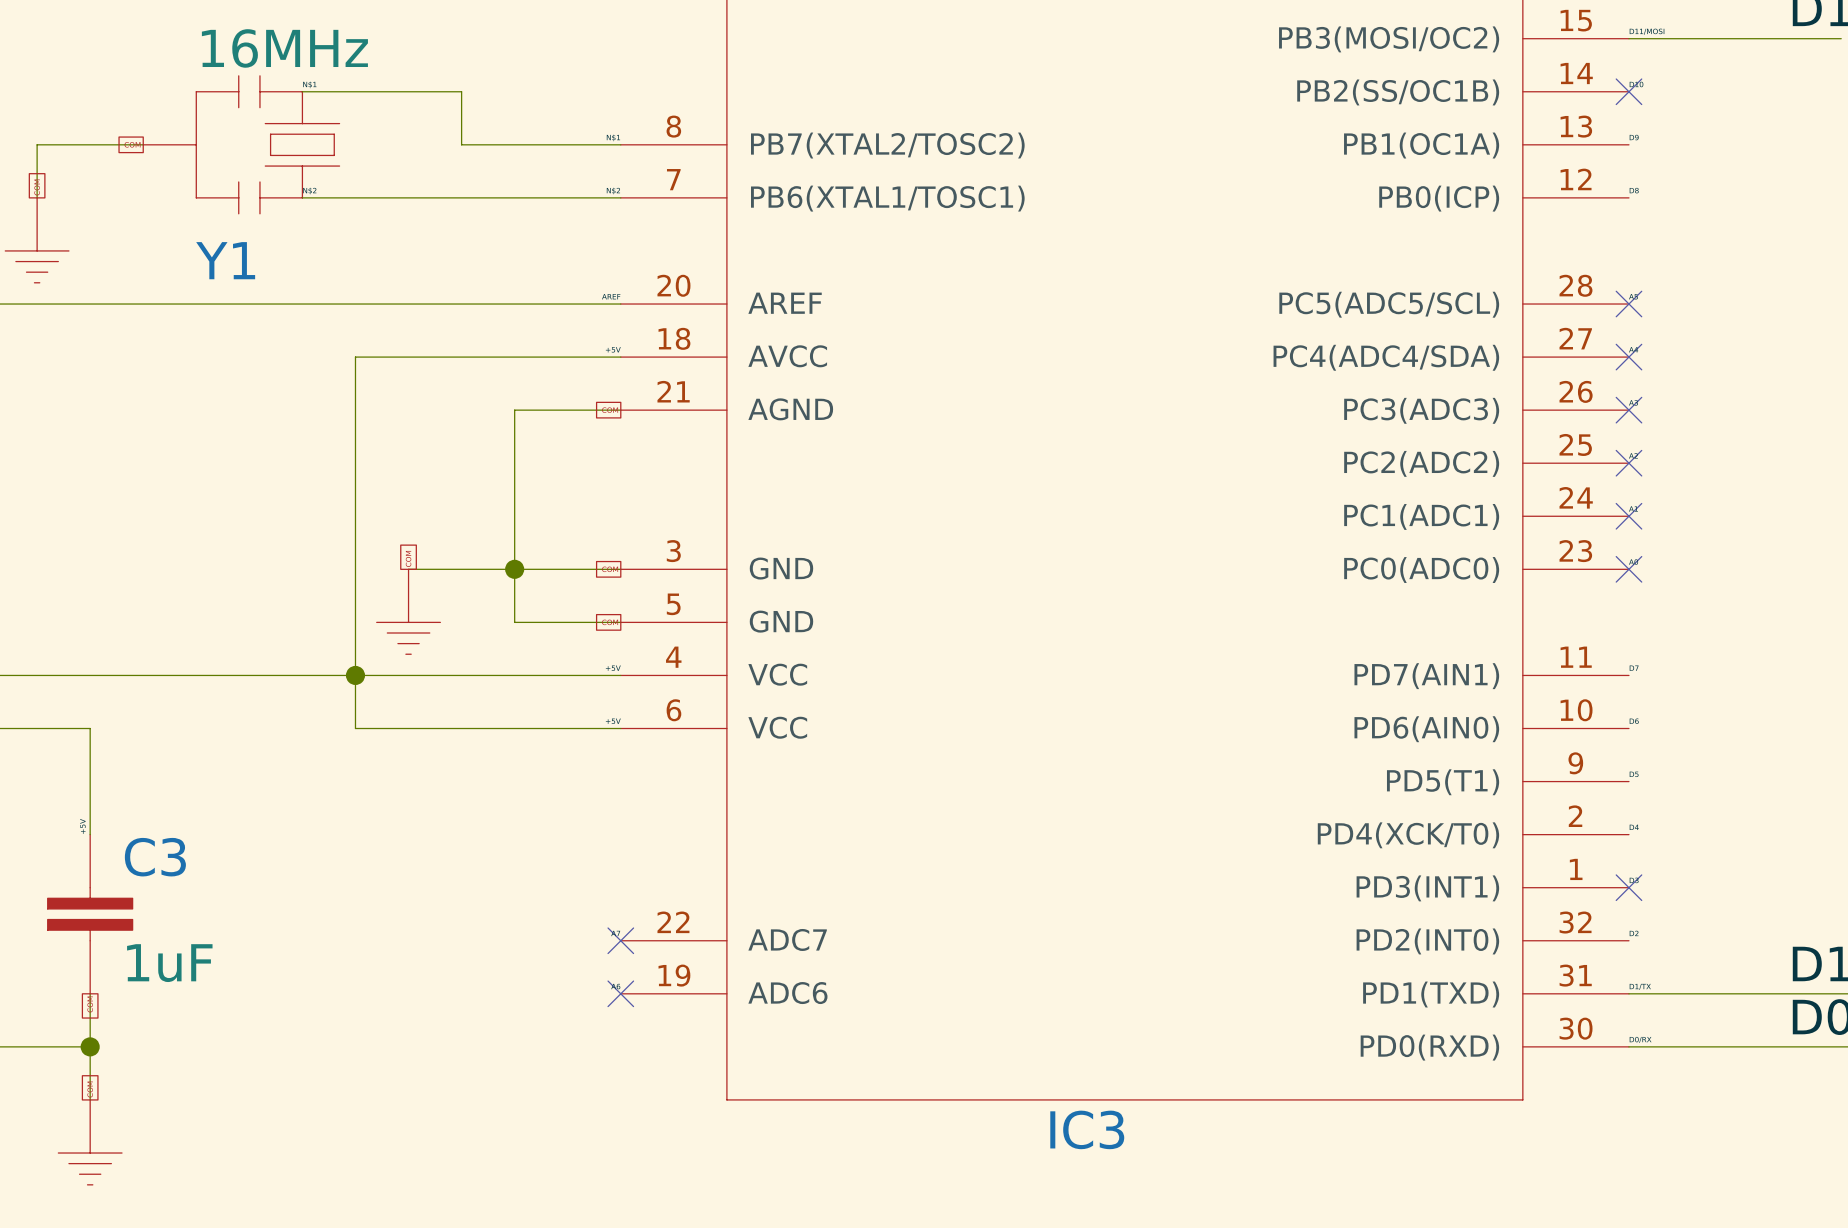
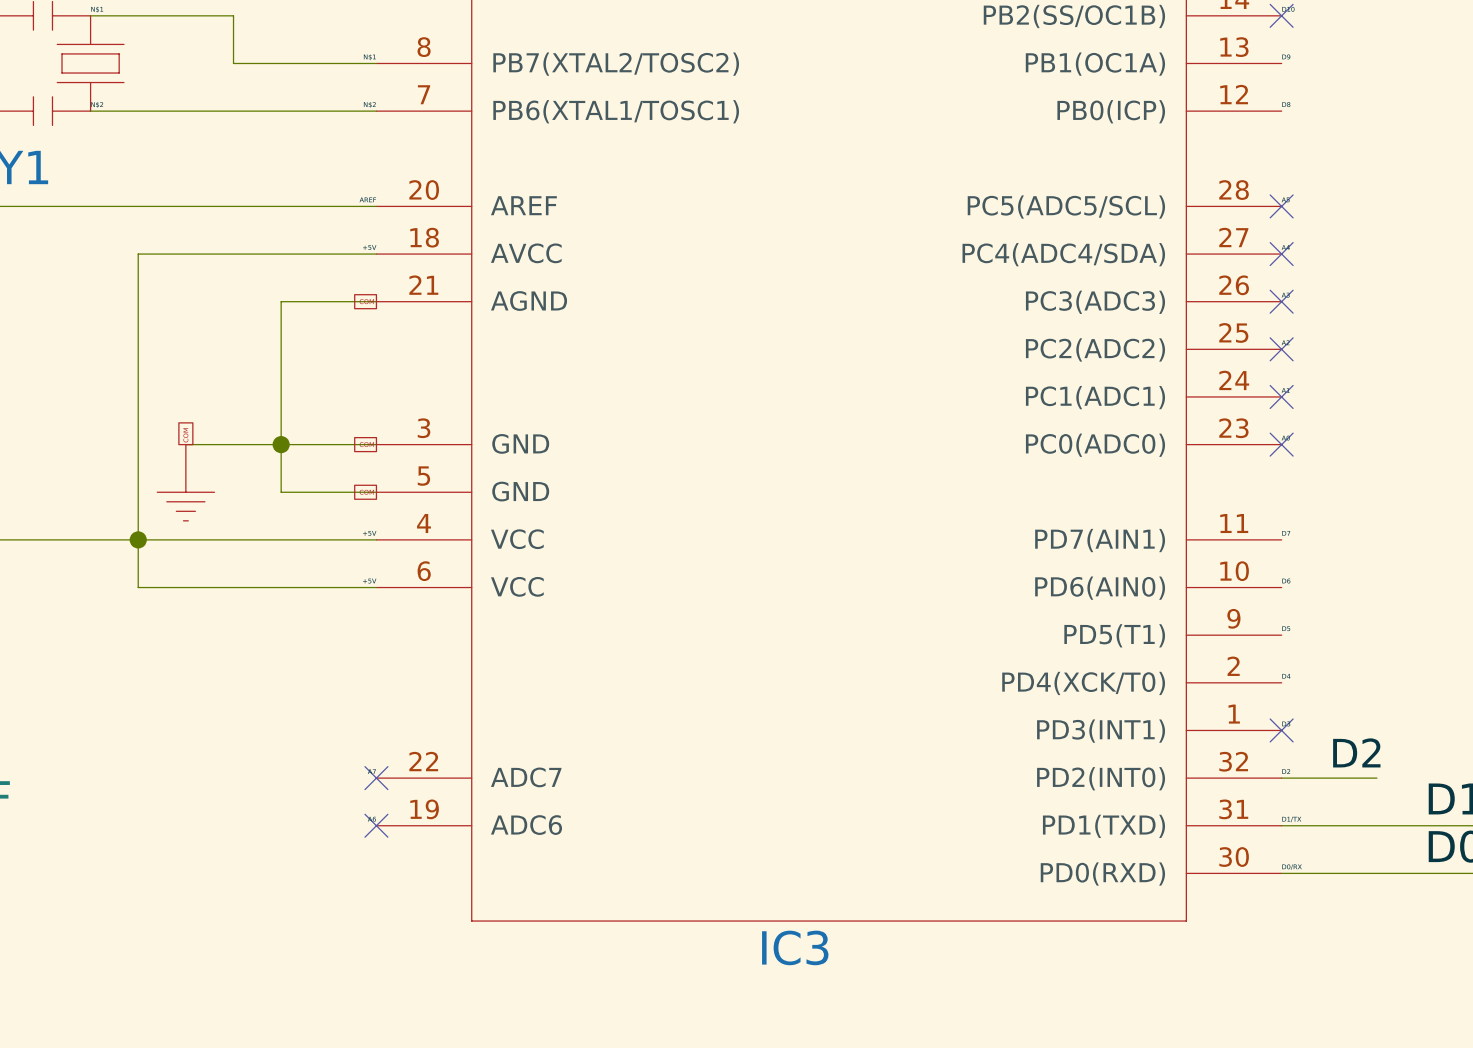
label: none -> D2 (1356, 752)
wire: none -> (1281, 778) (1376, 778)

